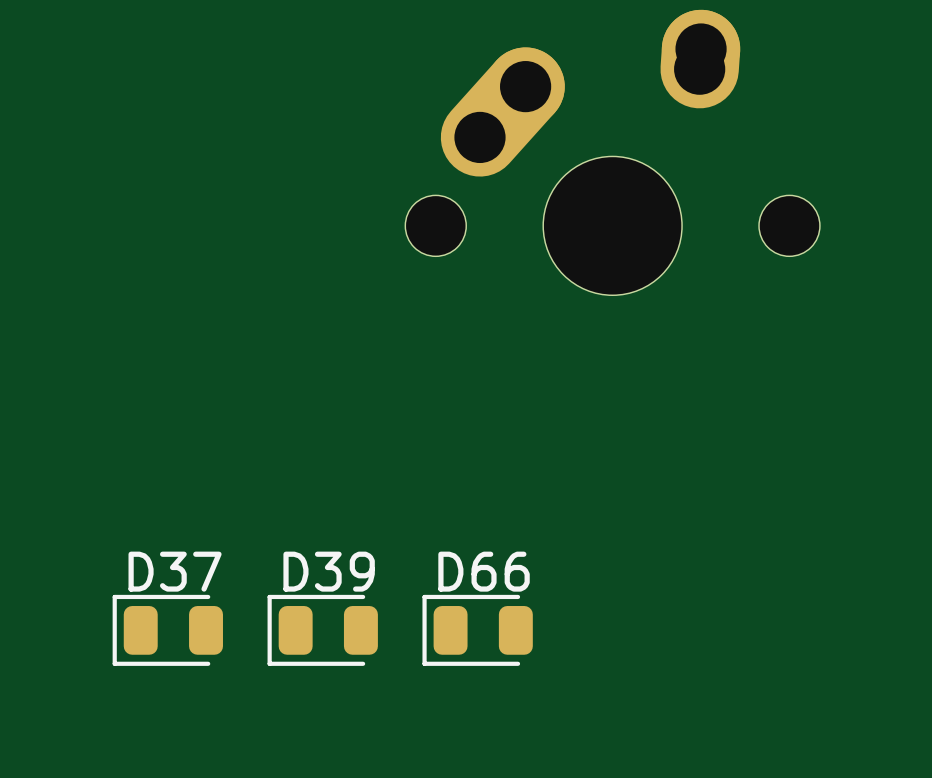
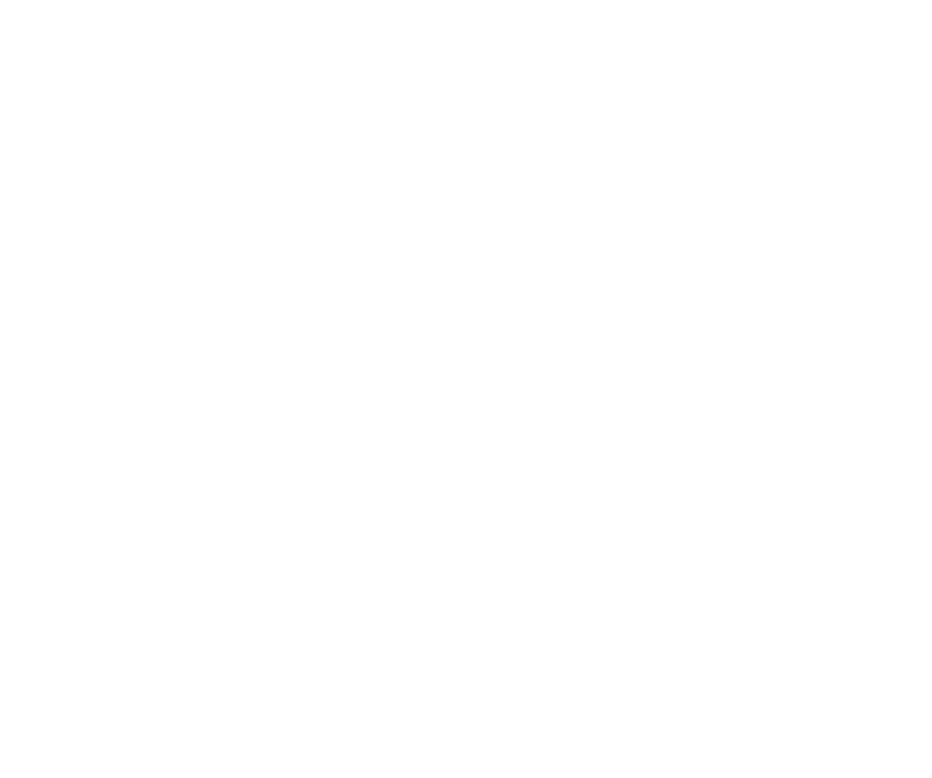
part: (612, 152) -> none
D37: (167, 630) -> none
D39: (322, 630) -> none
D66: (477, 630) -> none

